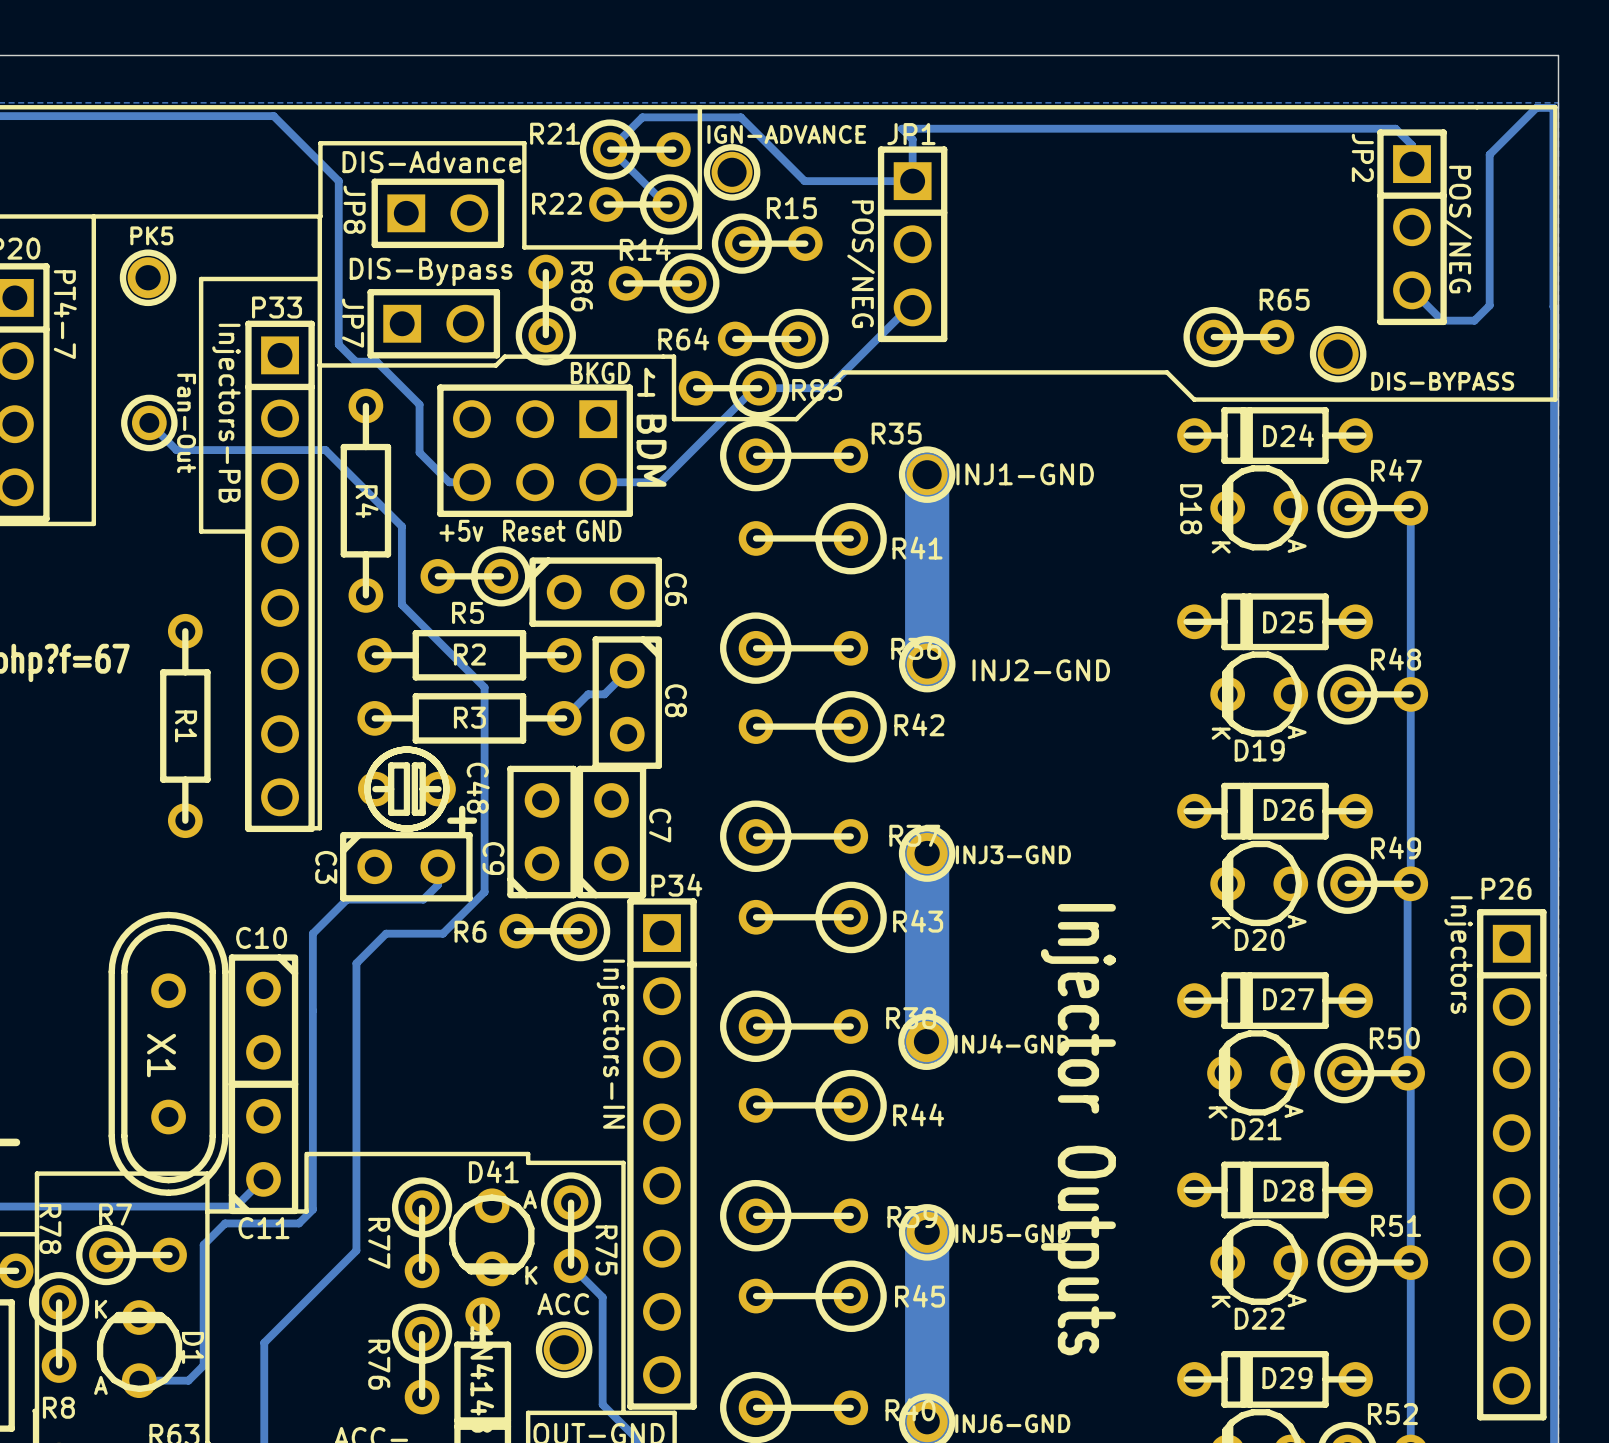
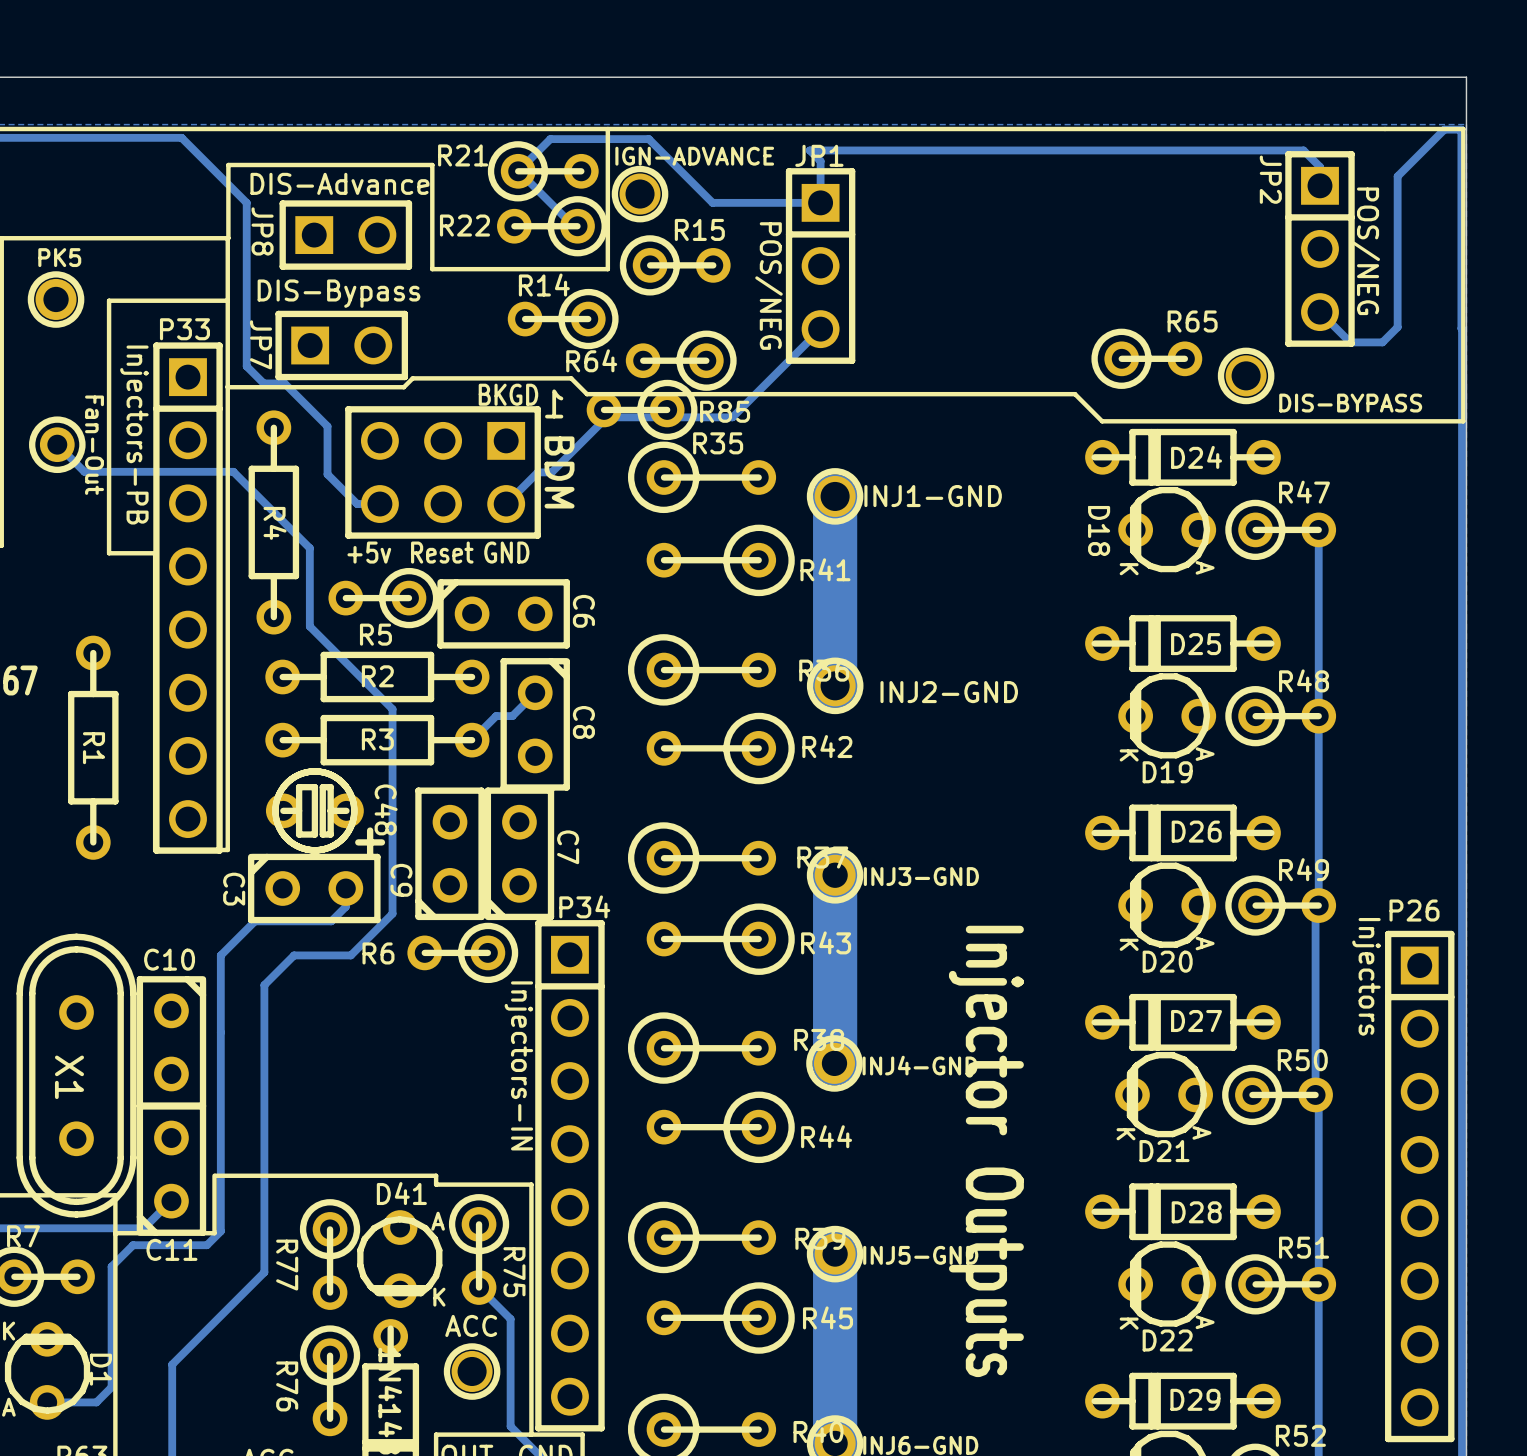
R14 position: (664, 283) -> (563, 319)
track: (912, 307) (908, 307) (828, 388) (754, 388) (660, 482) (598, 482) -> (820, 329) (732, 417) (606, 417) (551, 472) (537, 472) (506, 504)
R86: (545, 310) -> none
line: (663, 356) (673, 356) (673, 419) (796, 419) (843, 372) -> (571, 378) (587, 394) (751, 394)
R35 name position: R35 (896, 433) -> R35 (718, 443)

